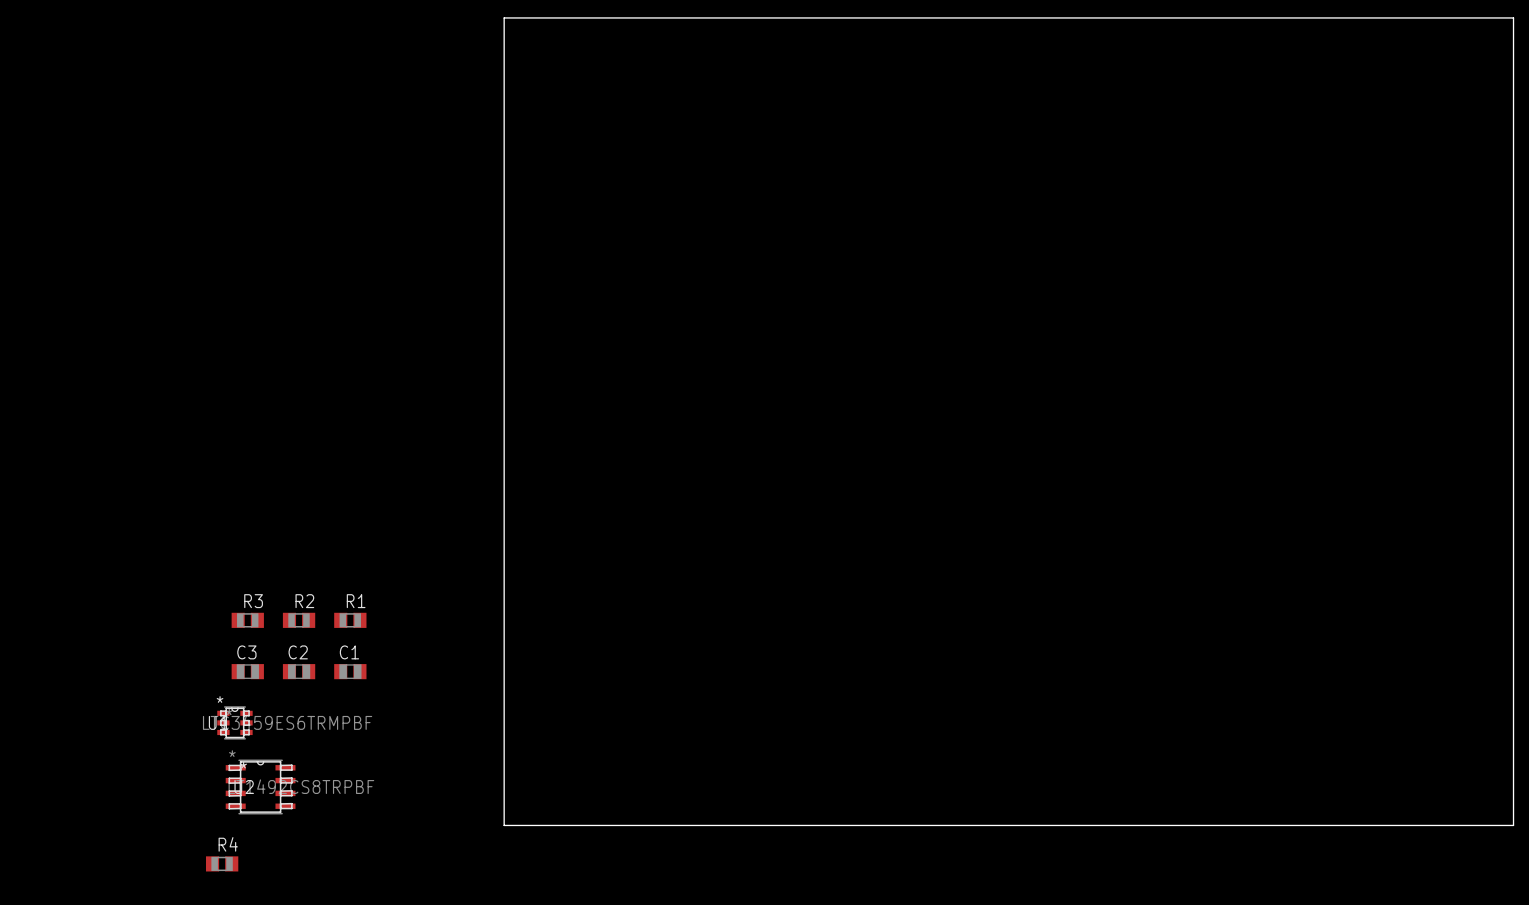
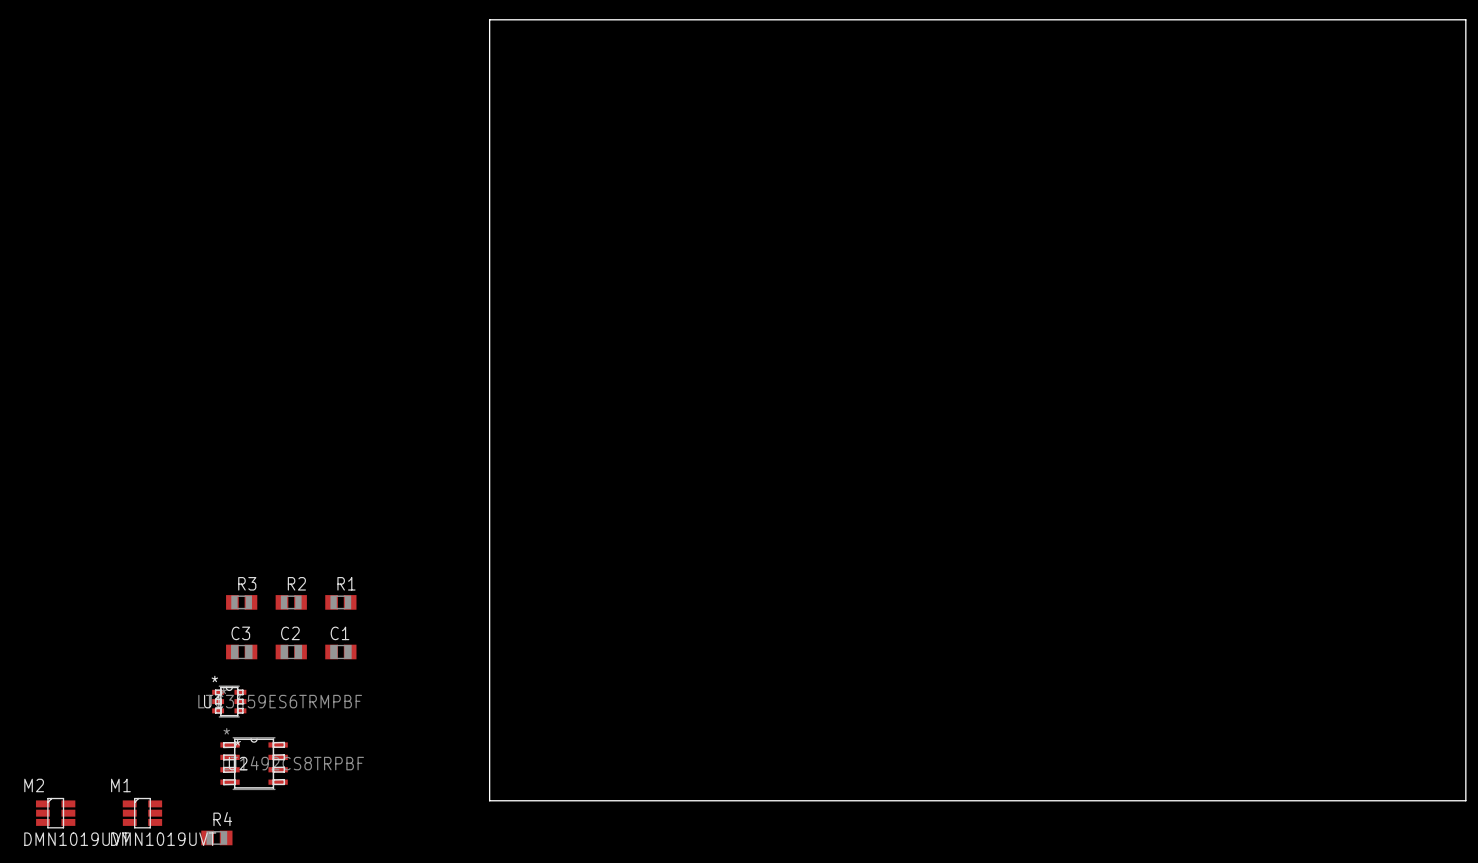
M2: none -> DMN1019UVT (55, 813)
M1: none -> DMN1019UVT (142, 813)

